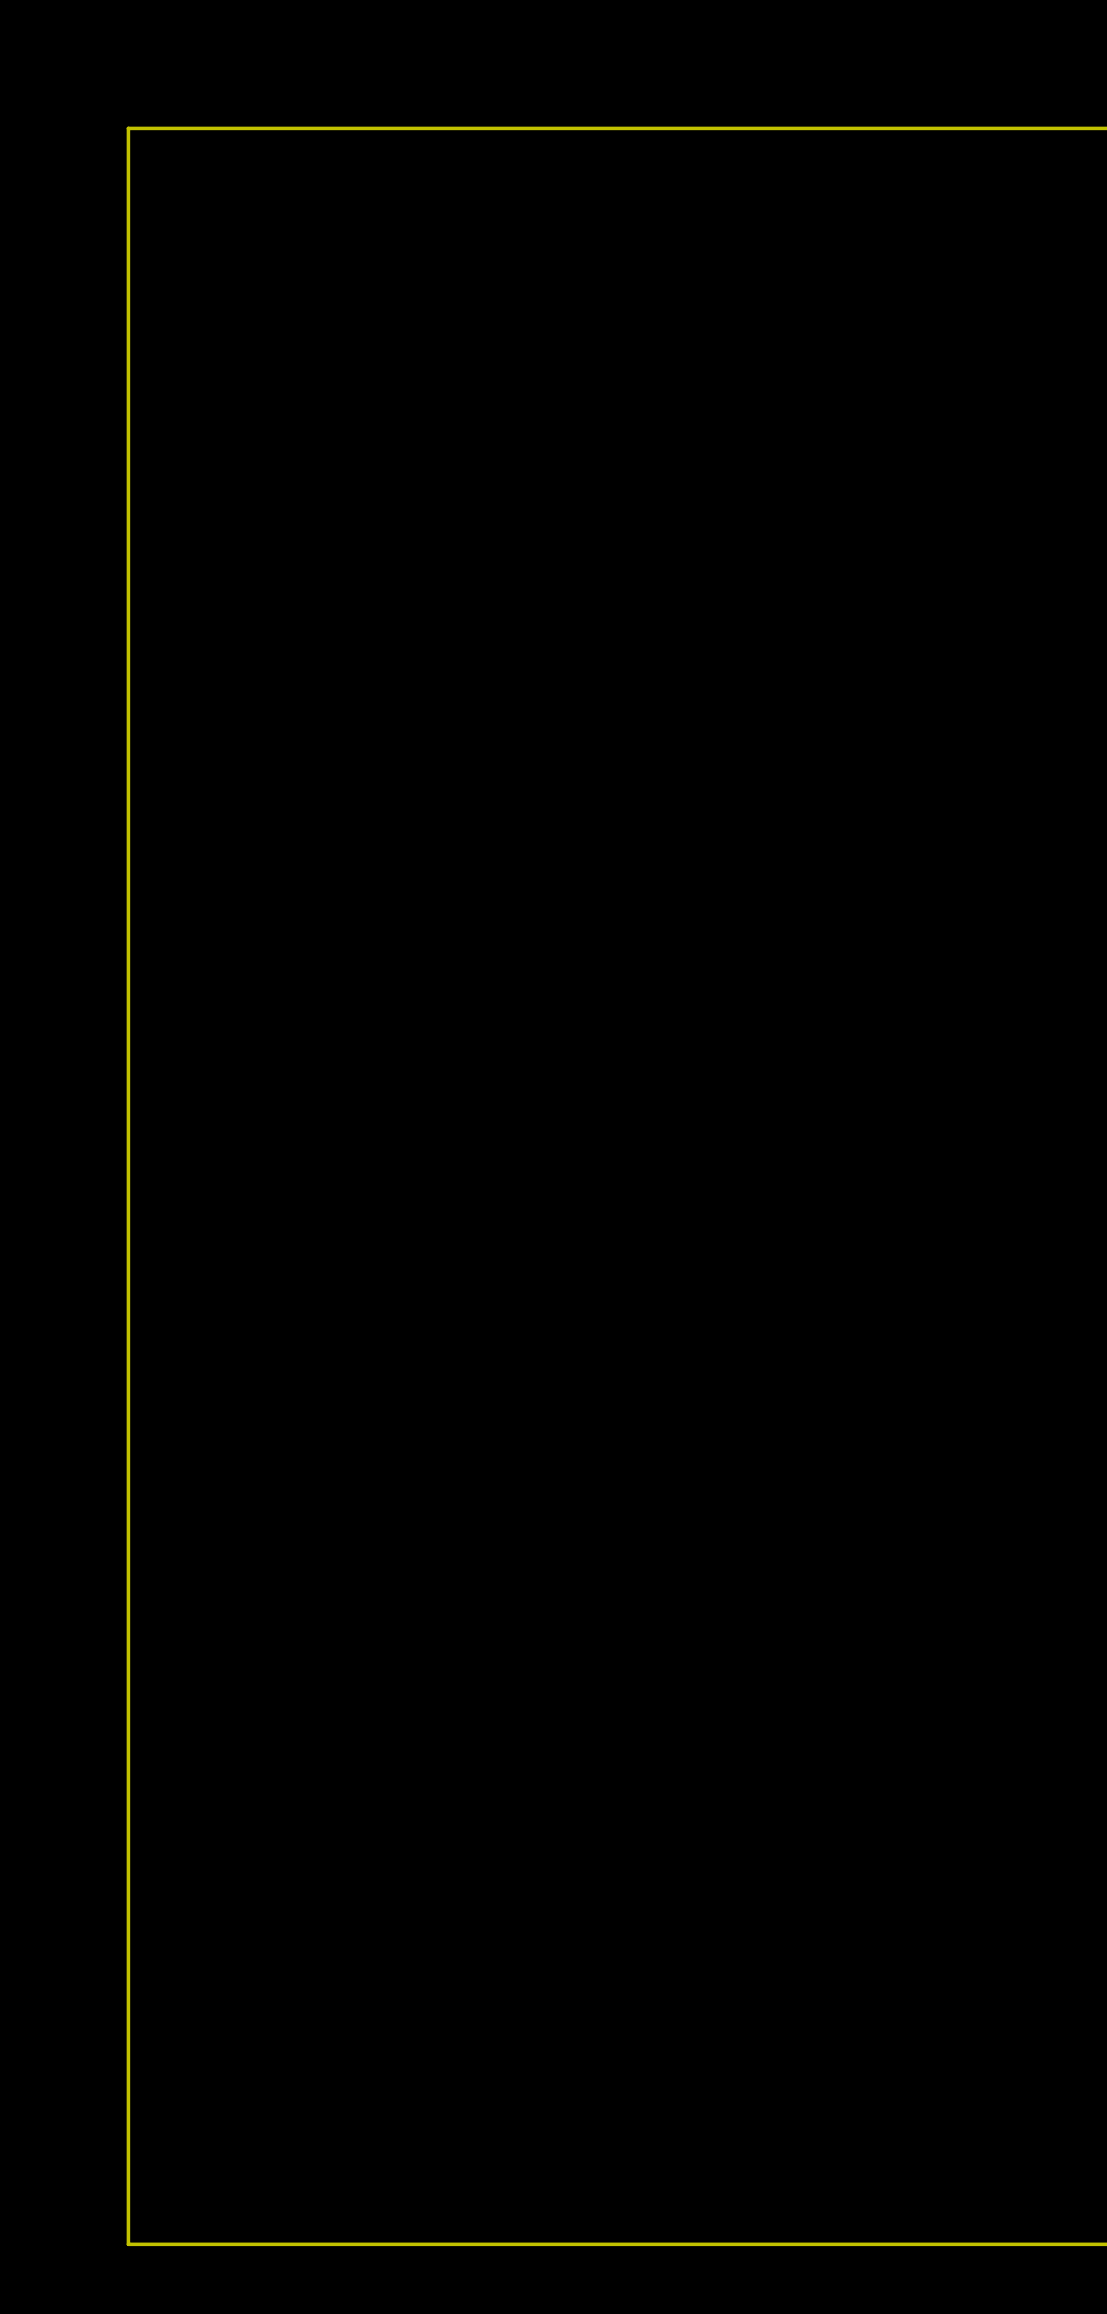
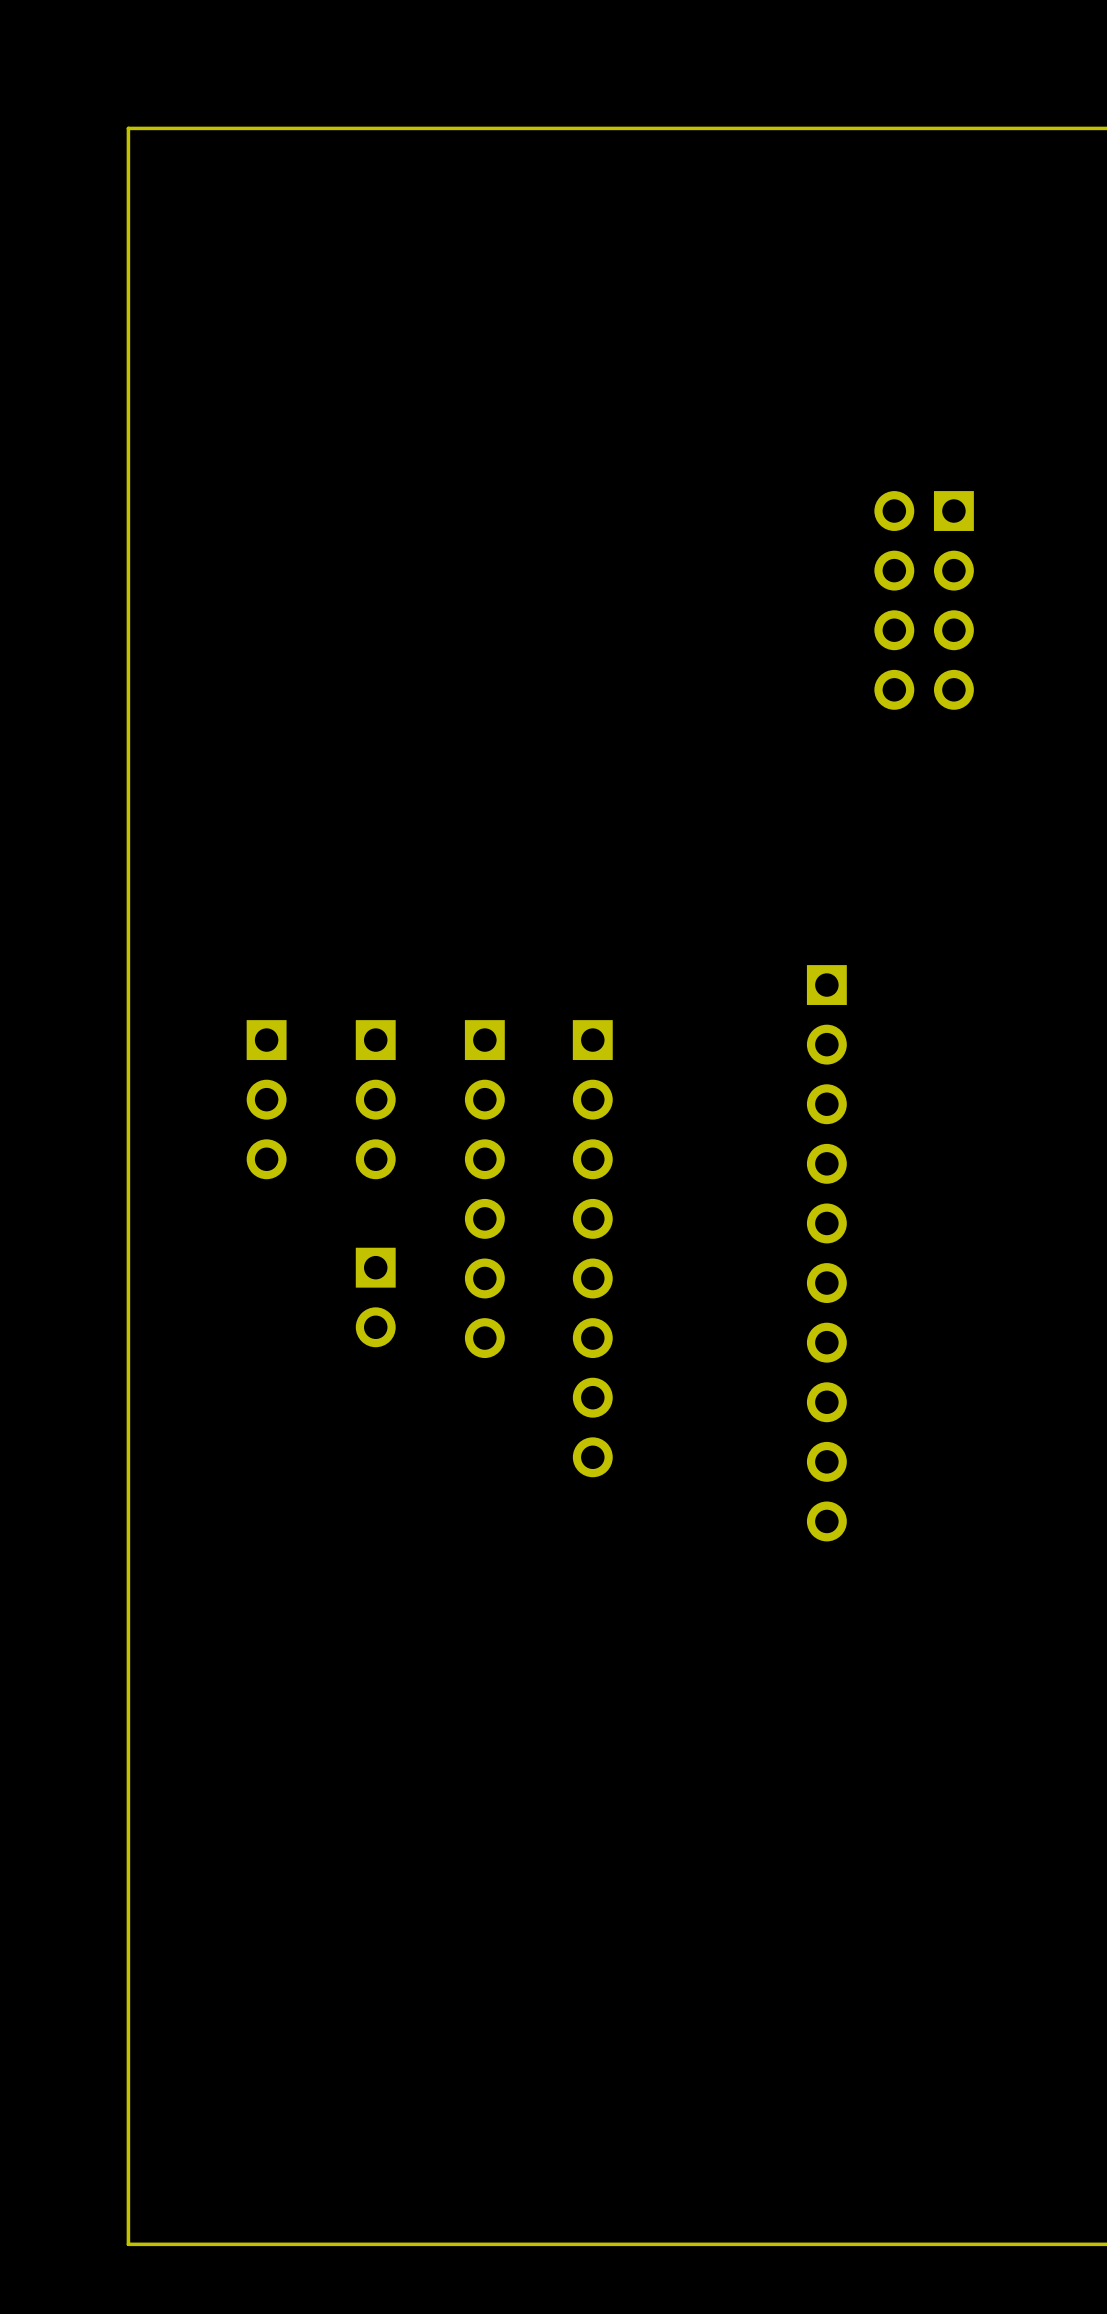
part: none -> (924, 600)
part: none -> (266, 1099)
part: none -> (375, 1099)
part: none -> (484, 1189)
part: none -> (592, 1248)
part: none -> (826, 1253)
part: none -> (375, 1297)

